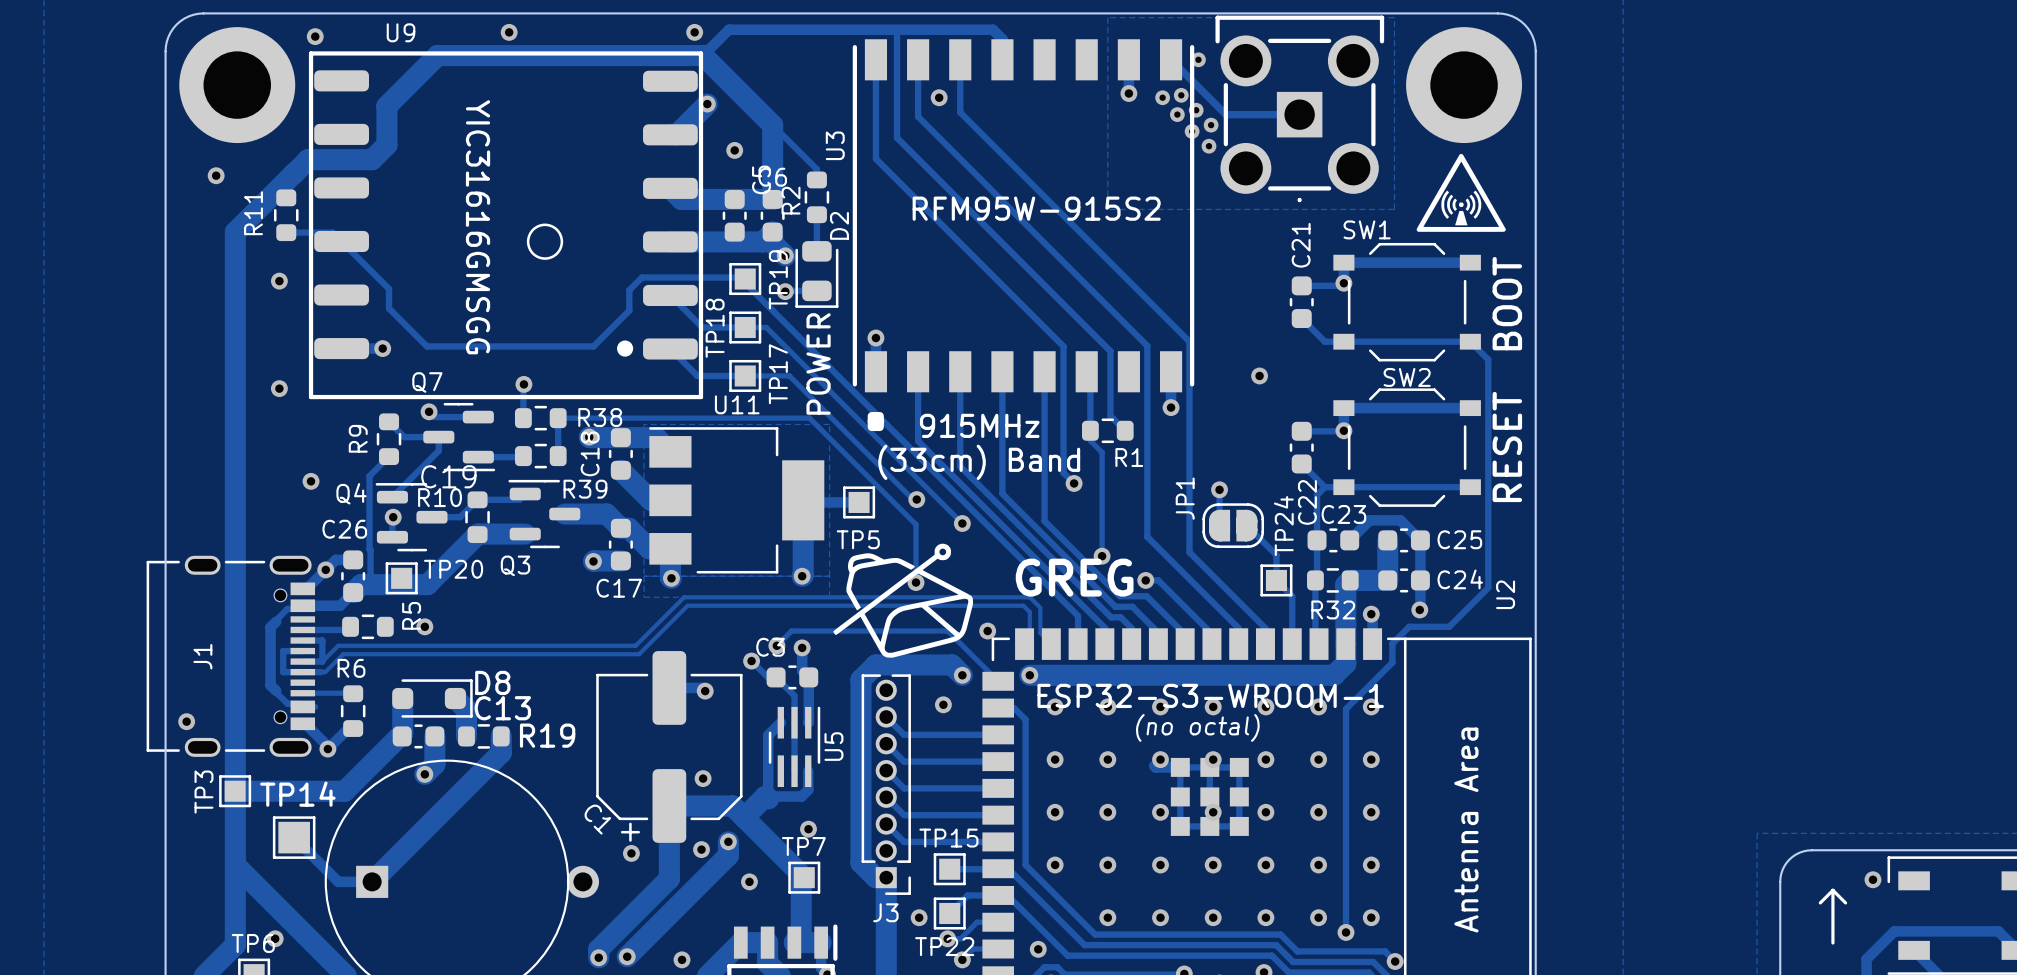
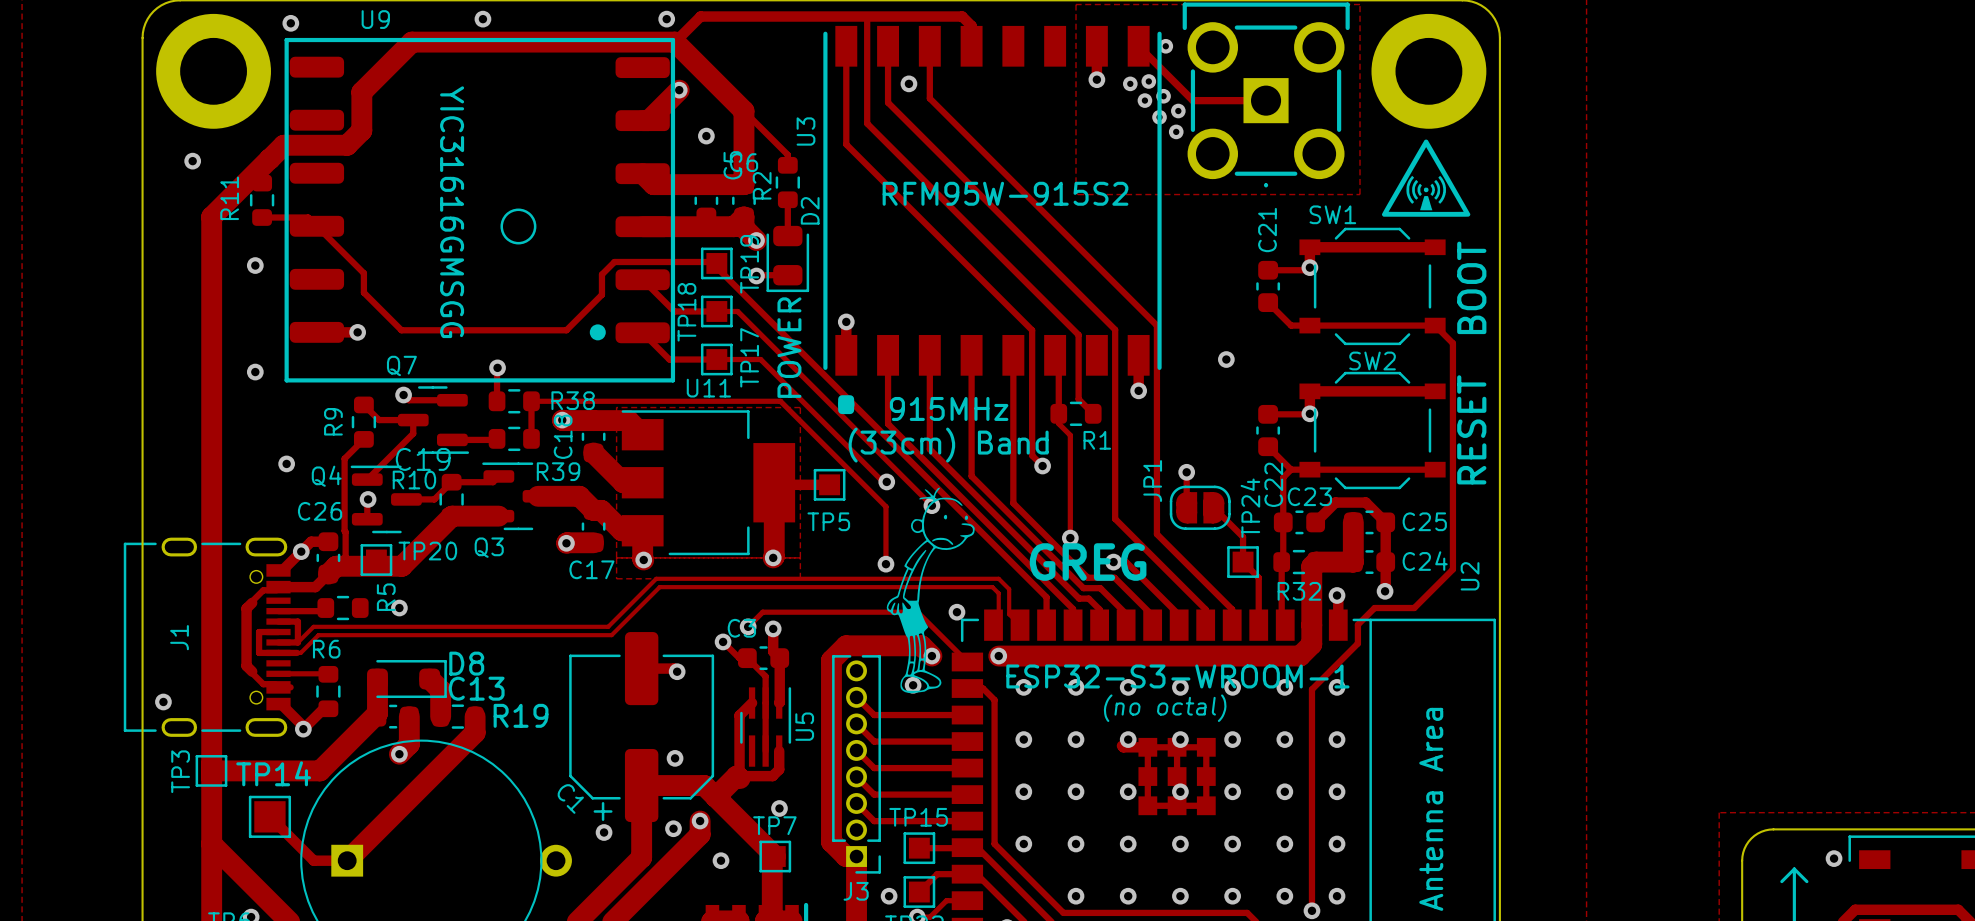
drawing: none -> [886, 487, 975, 694]
drawing: [833, 543, 974, 658] -> none
text position: GREG (1074, 577) -> GREG (1088, 562)

